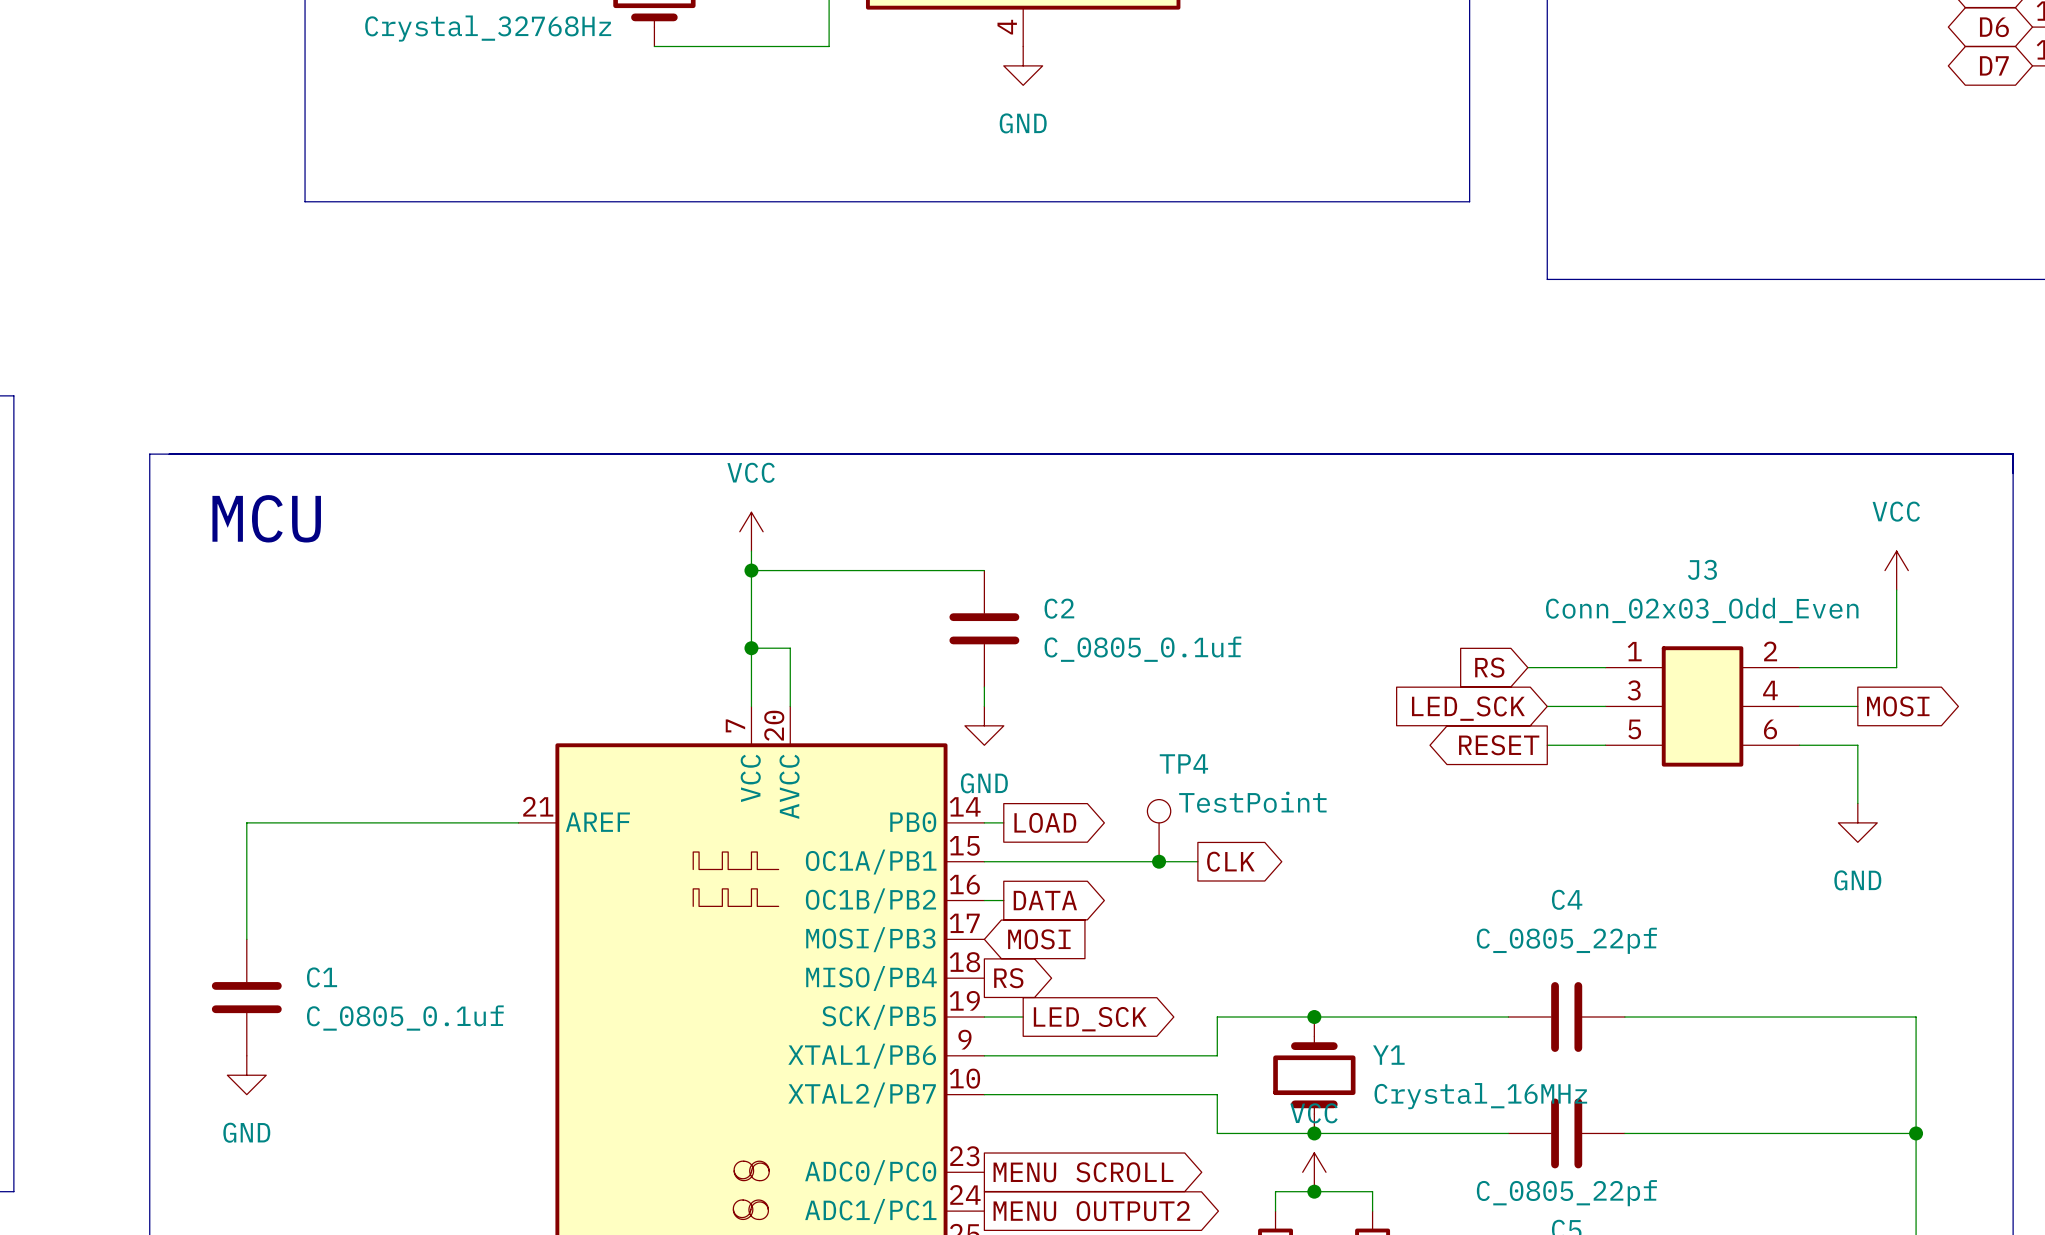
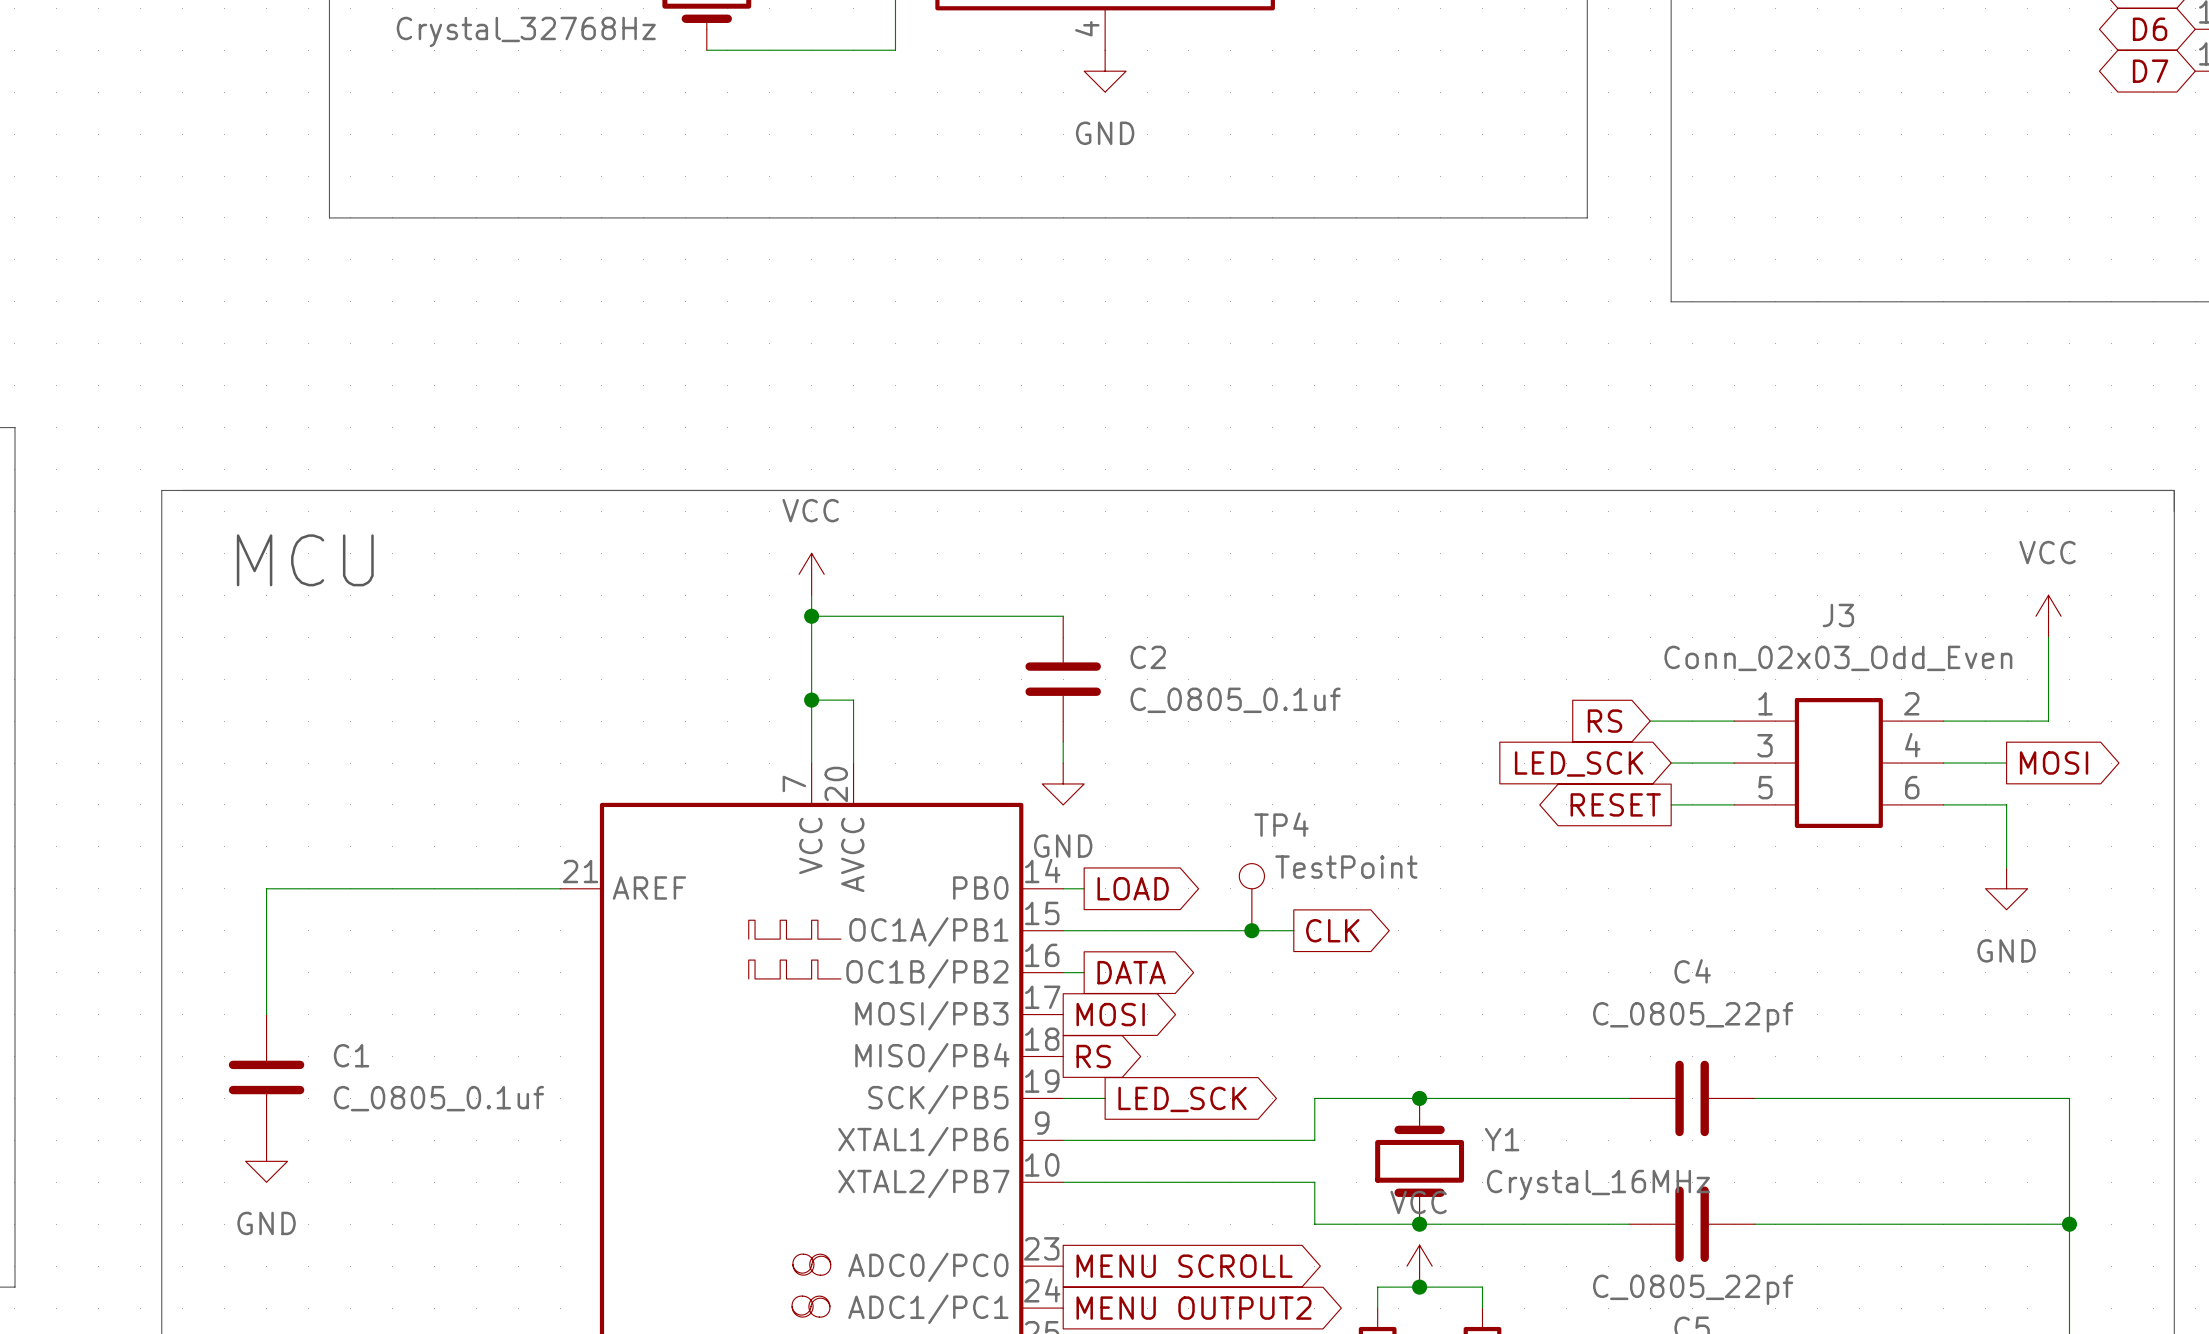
global label shape: input (1039, 939) -> output (1110, 1014)

